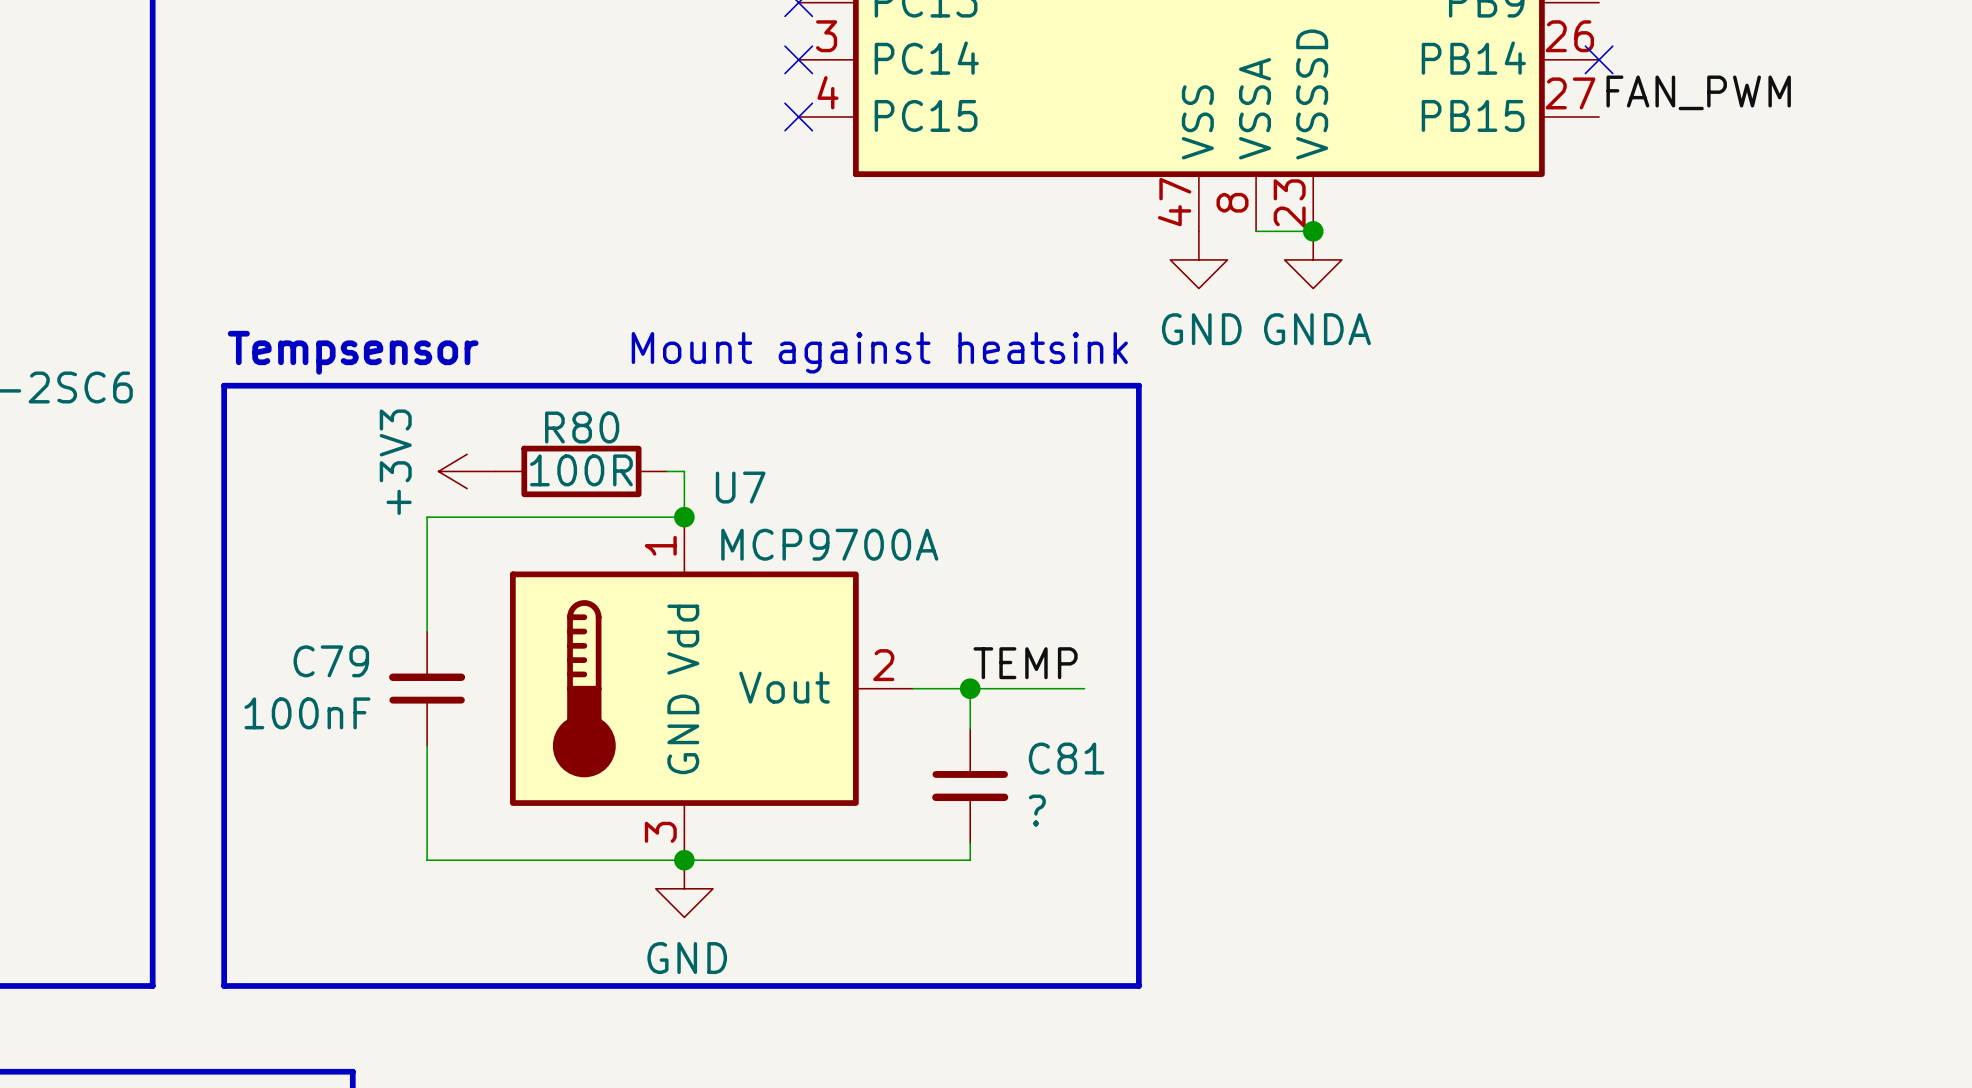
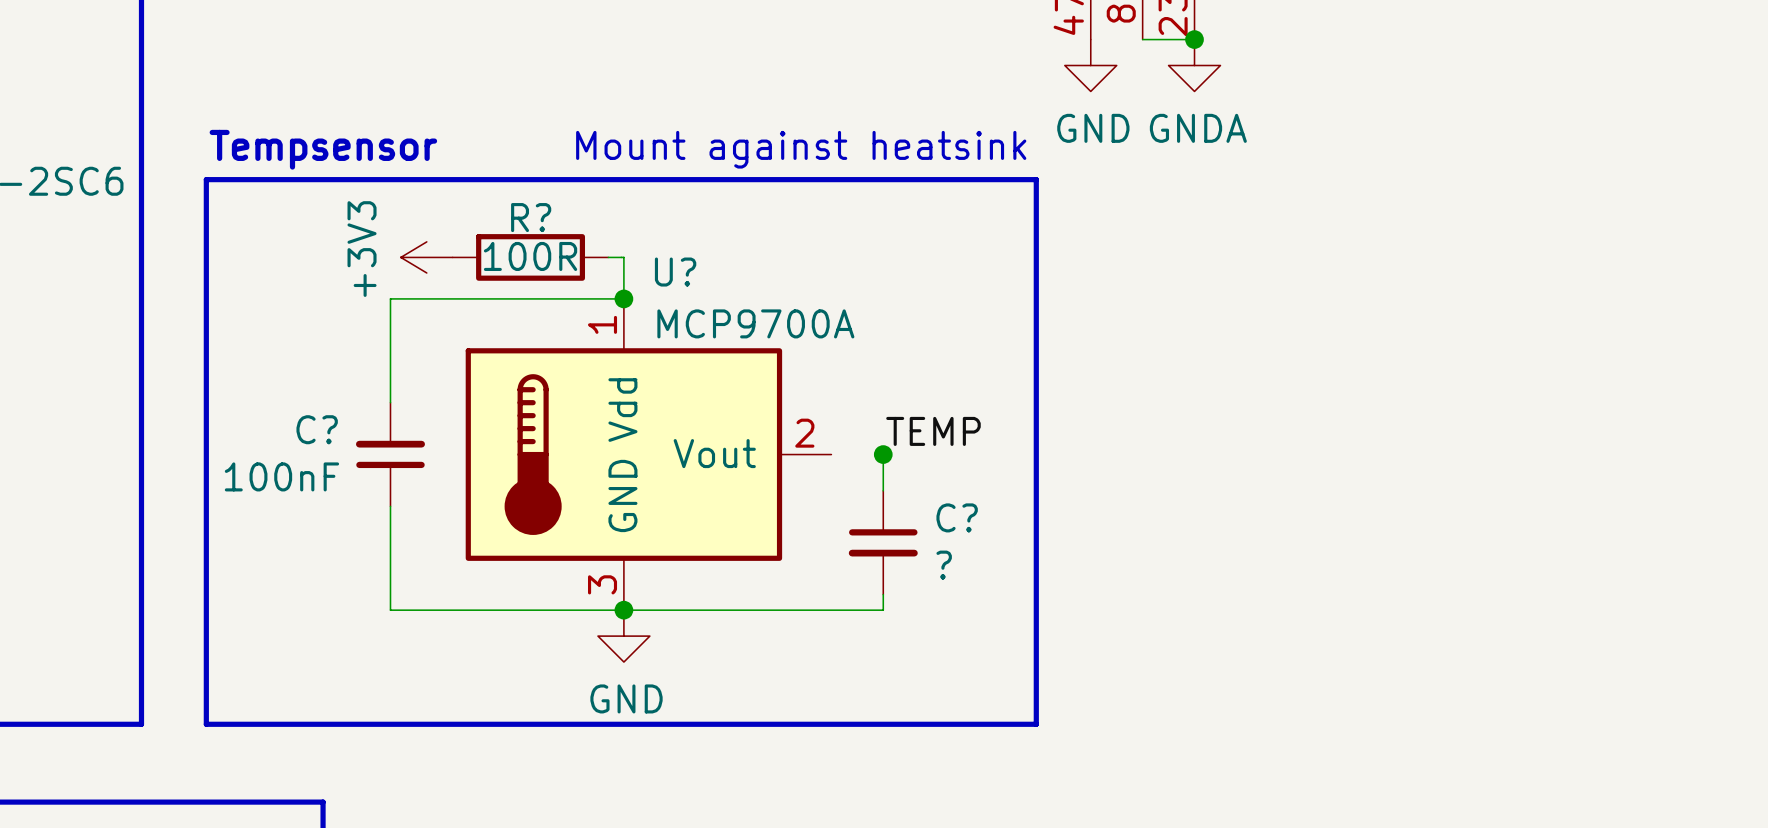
R80 name: R80 (582, 427) -> R? (531, 217)
U7 name: U7 (740, 487) -> U? (675, 272)
C79 name: C79 (331, 661) -> C? (317, 429)
wire: (913, 688) (1084, 688) -> none
C81 name: C81 (1066, 758) -> C? (957, 517)

